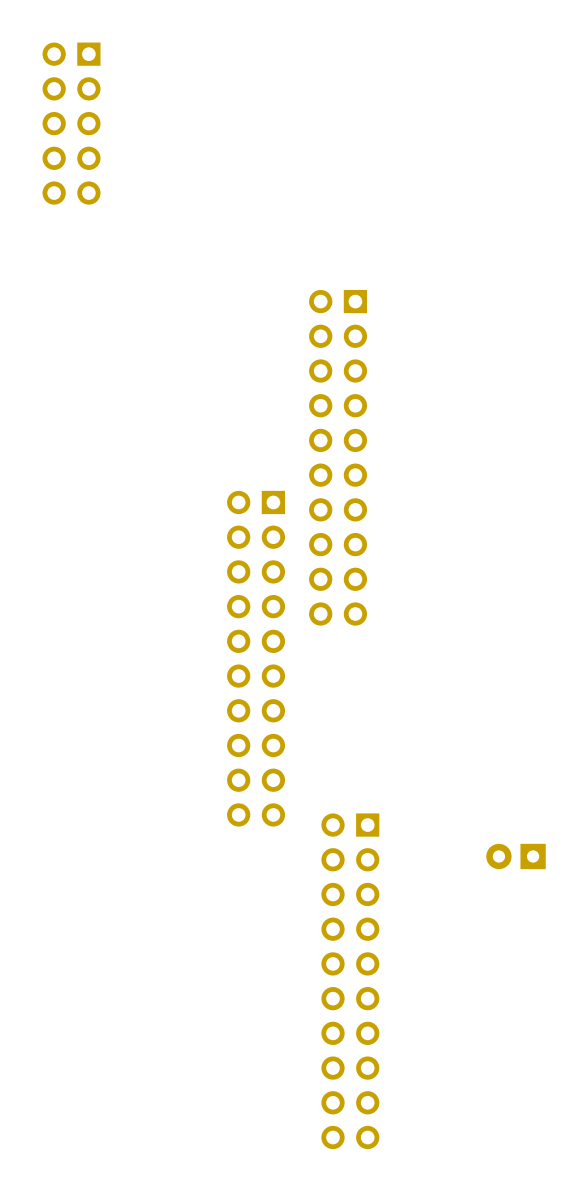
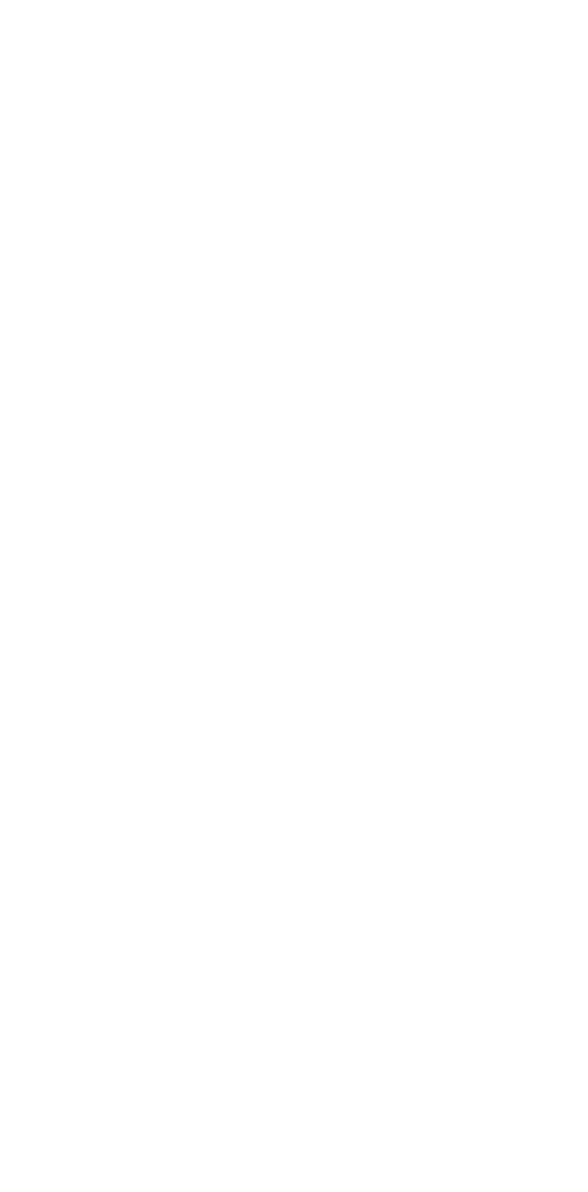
part: (71, 123) -> none
part: (338, 457) -> none
part: (256, 658) -> none
part: (516, 856) -> none
part: (350, 981) -> none

